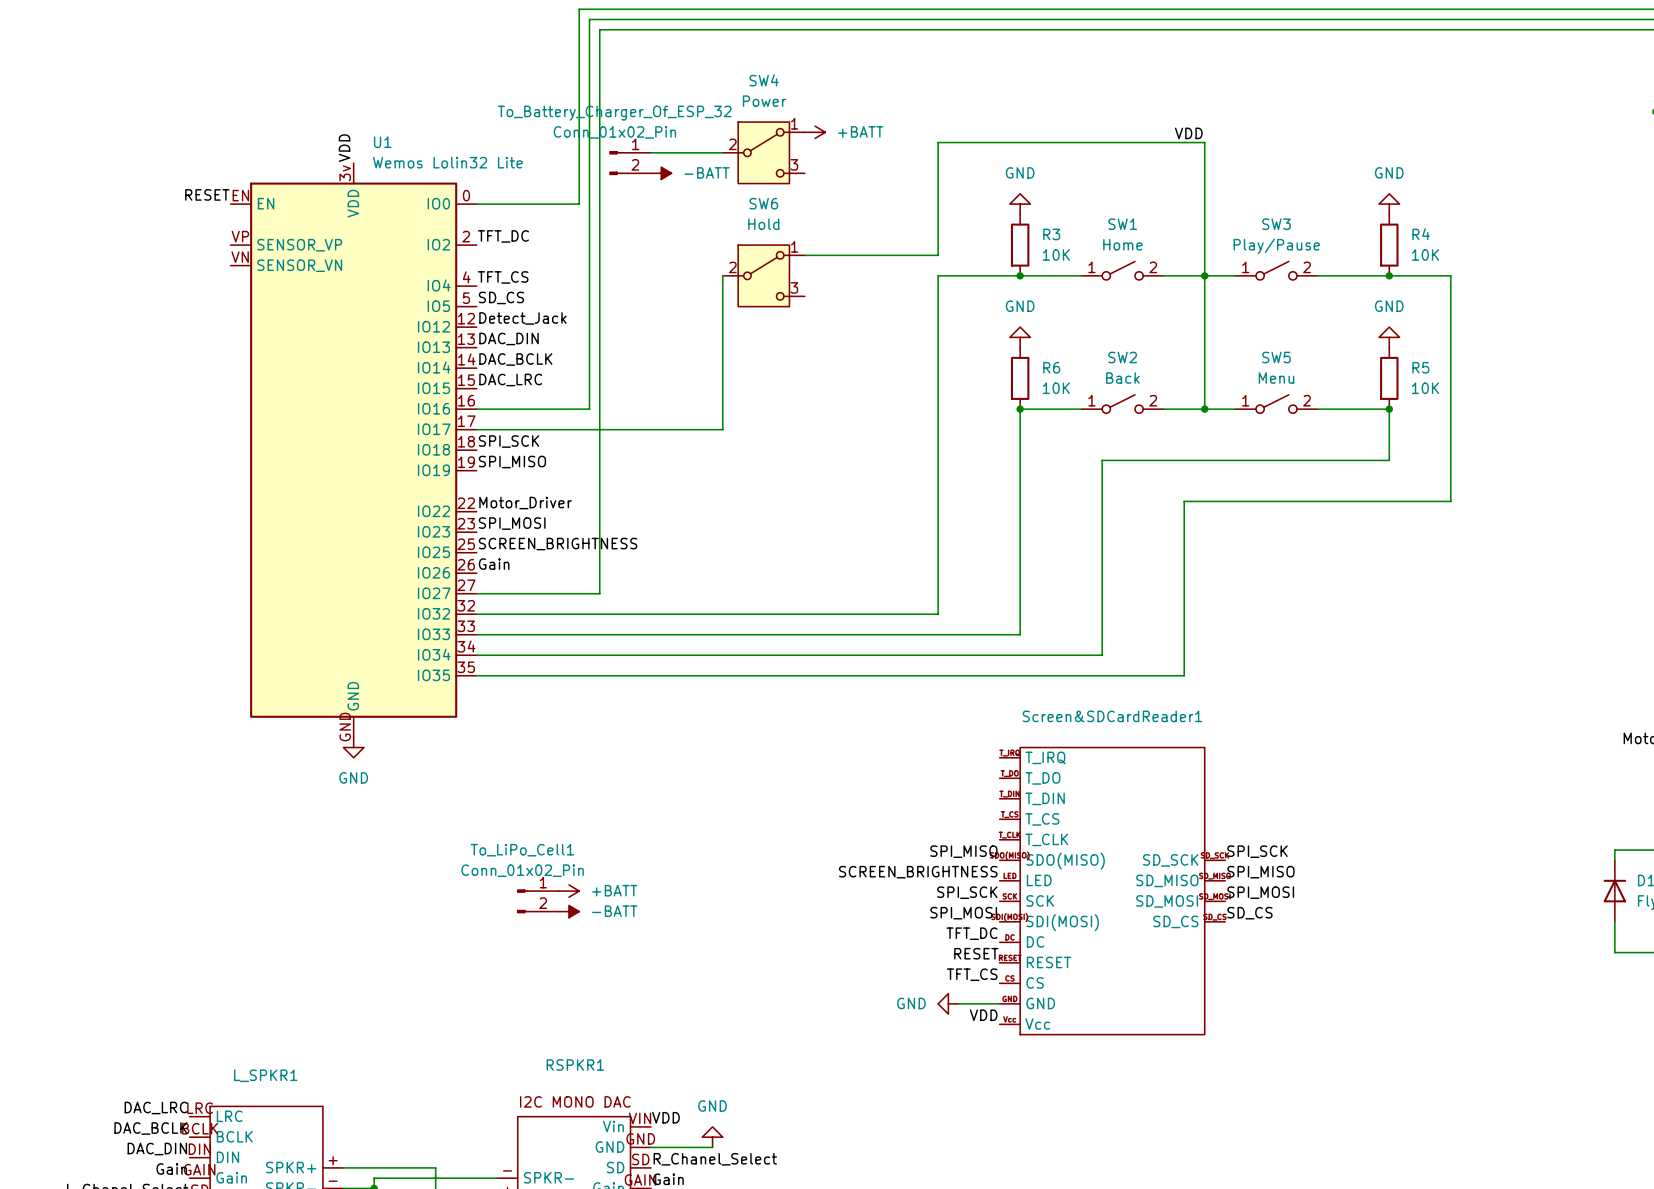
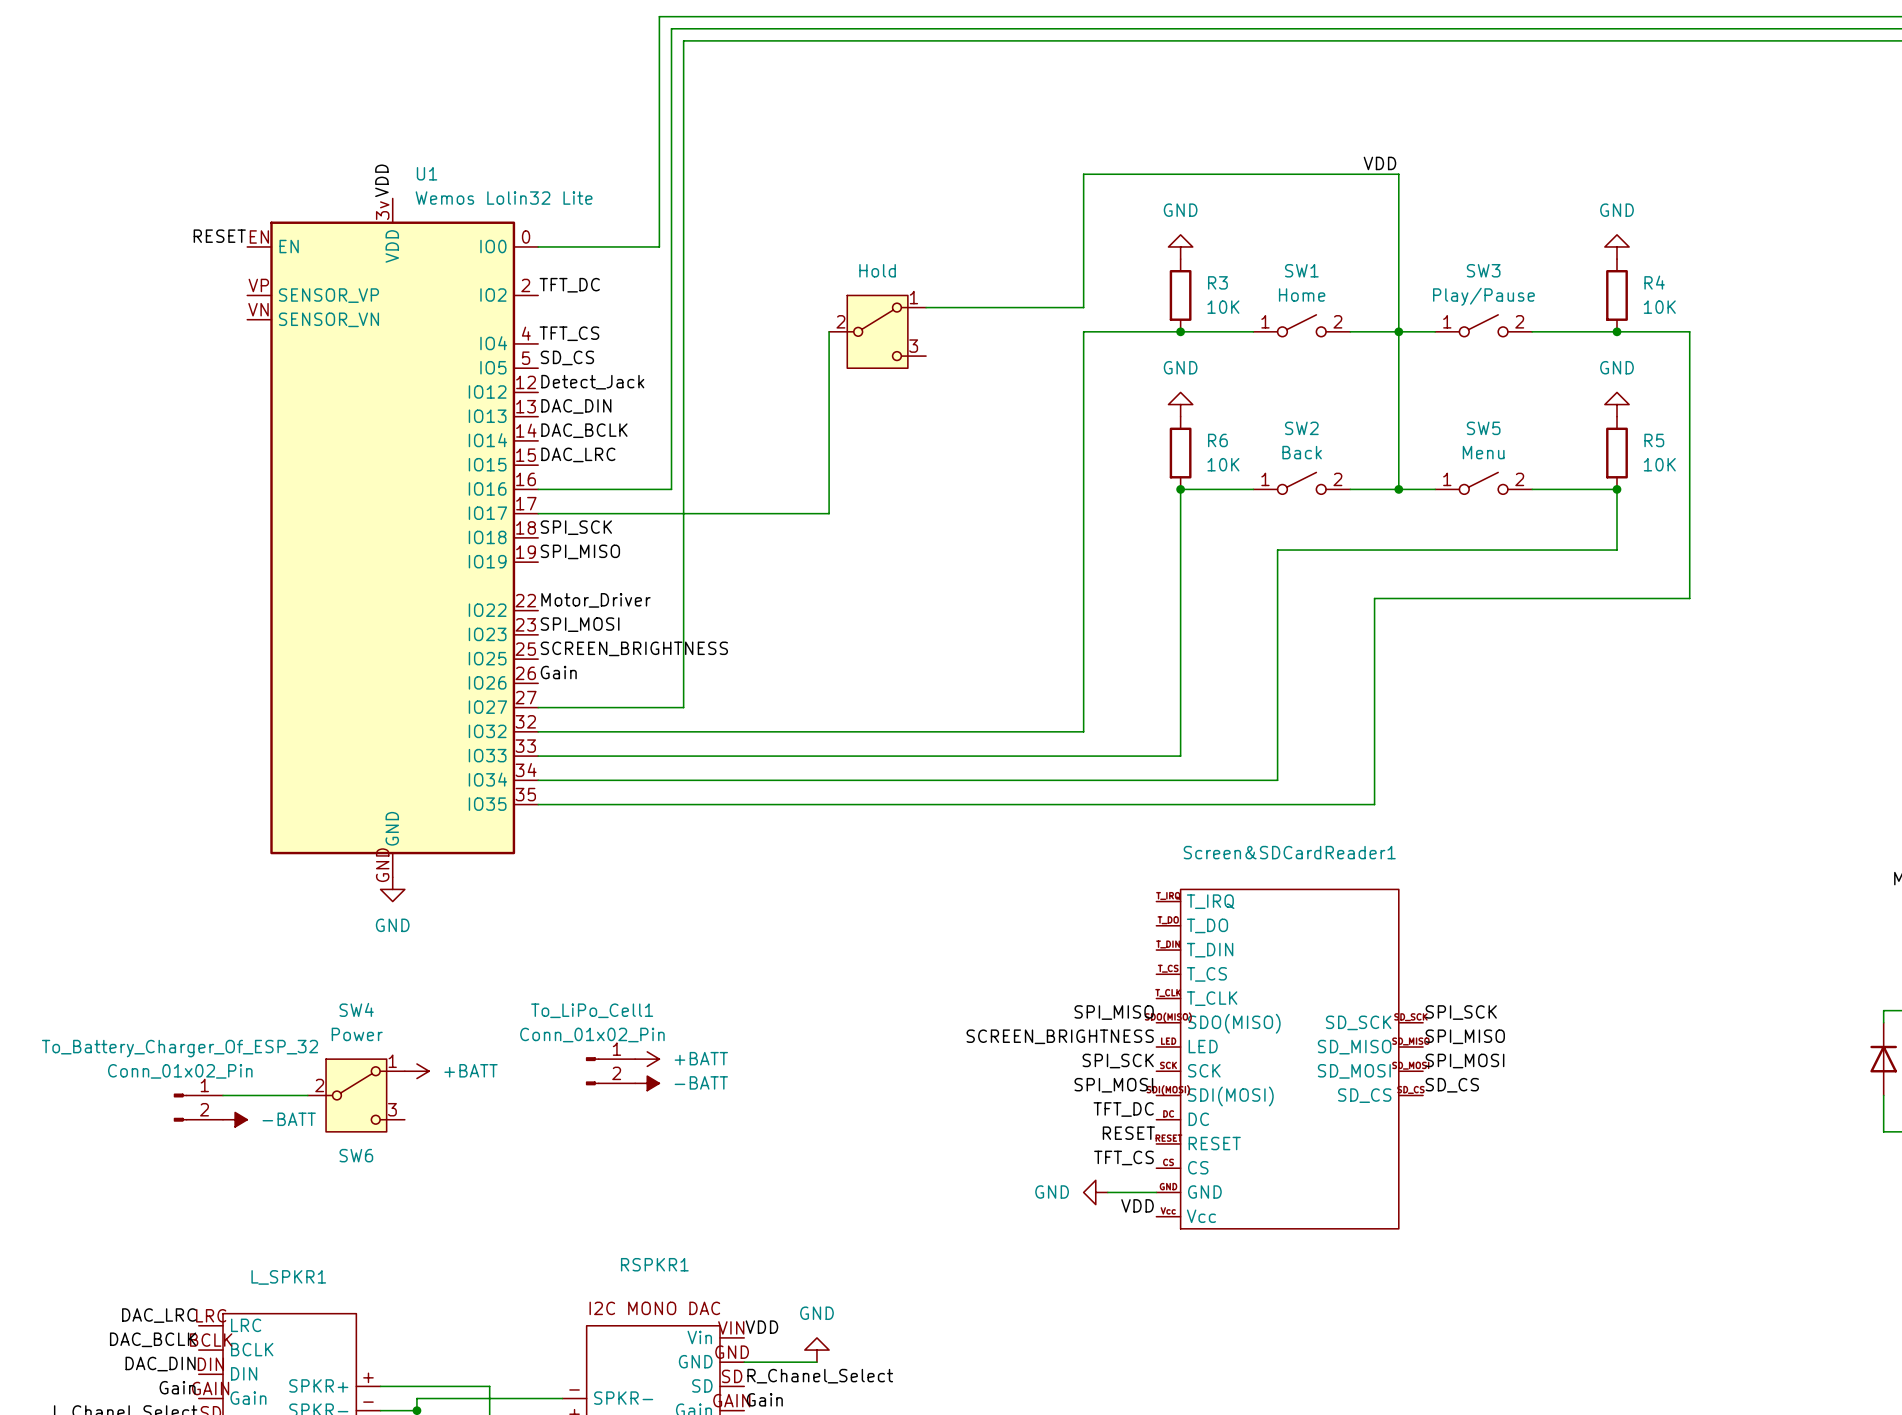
power symbol: +BATT (815, 132) -> none
wire: (651, 152) (722, 152) -> none
SW4 position: (763, 152) -> (356, 1095)
To_Battery_Charger_Of_ESP_32 position: (630, 163) -> (198, 1107)
power symbol: -BATT (661, 173) -> none
SW6 name position: SW6 (763, 203) -> SW6 (356, 1155)
power symbol: none -> +BATT (416, 1071)
wire: none -> (223, 1095) (307, 1095)
power symbol: none -> -BATT (235, 1119)

